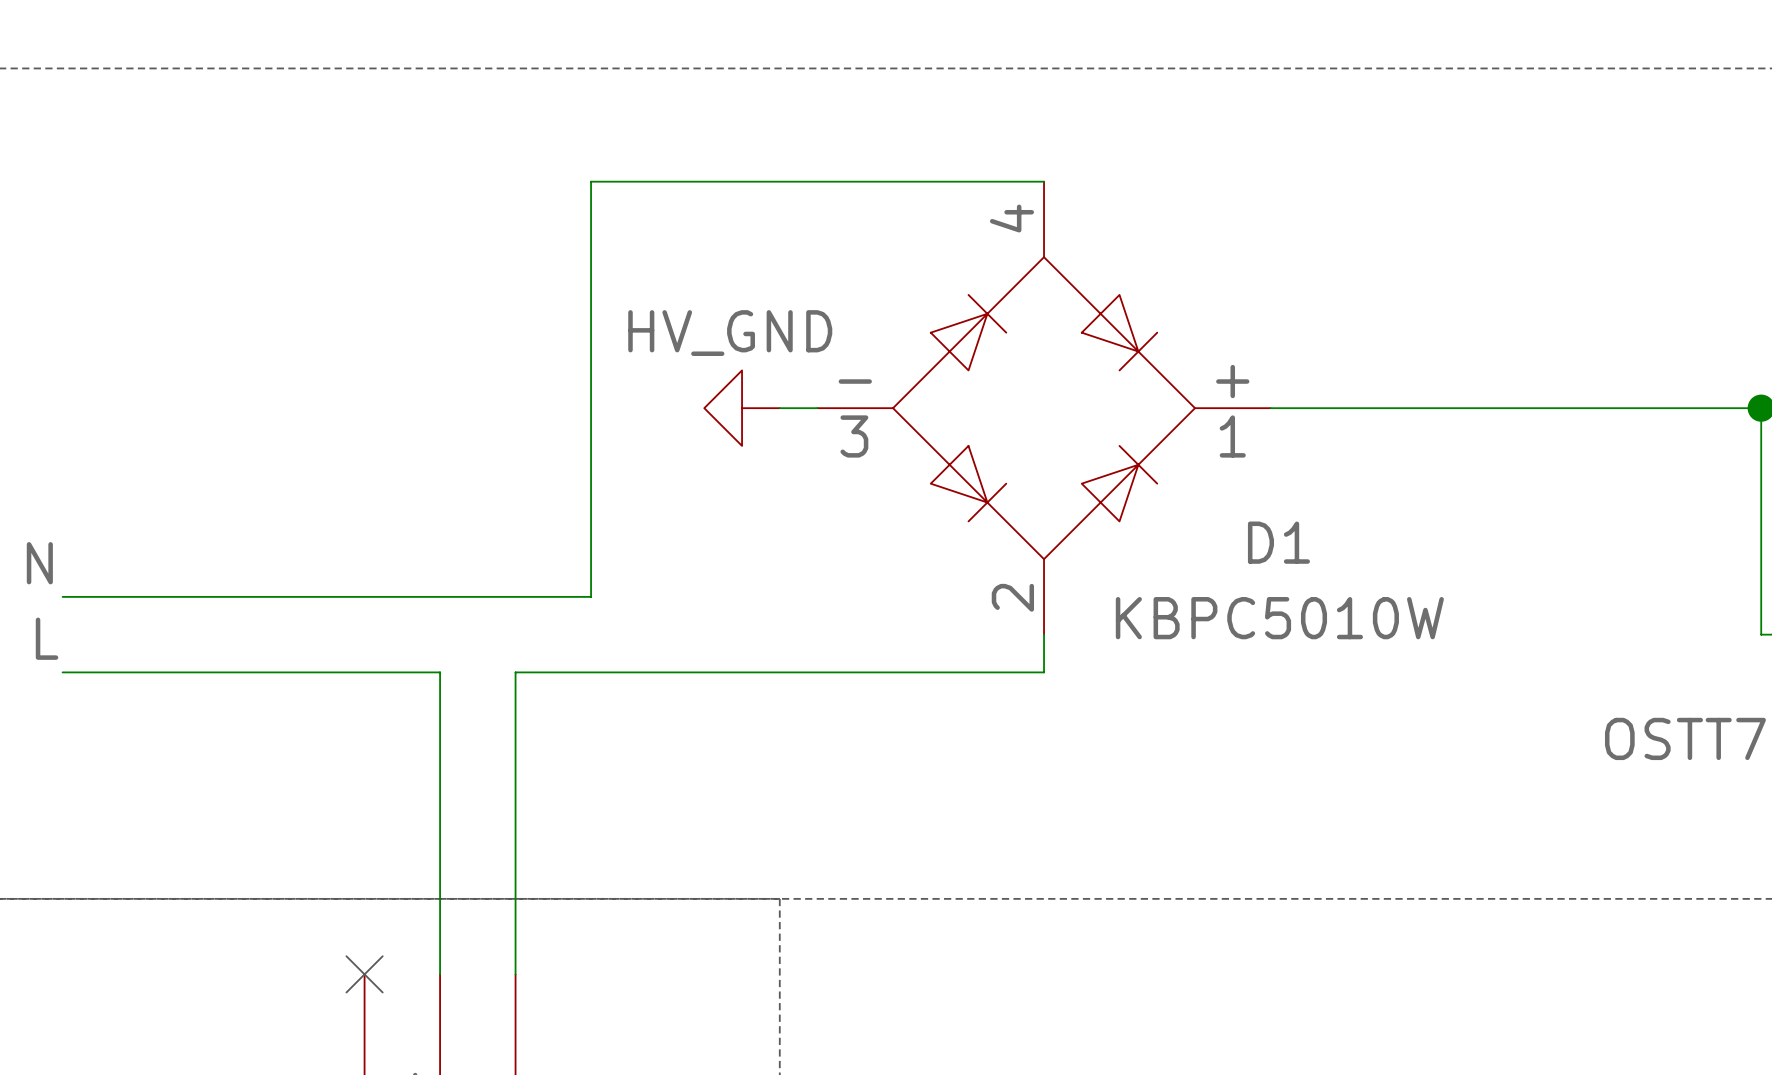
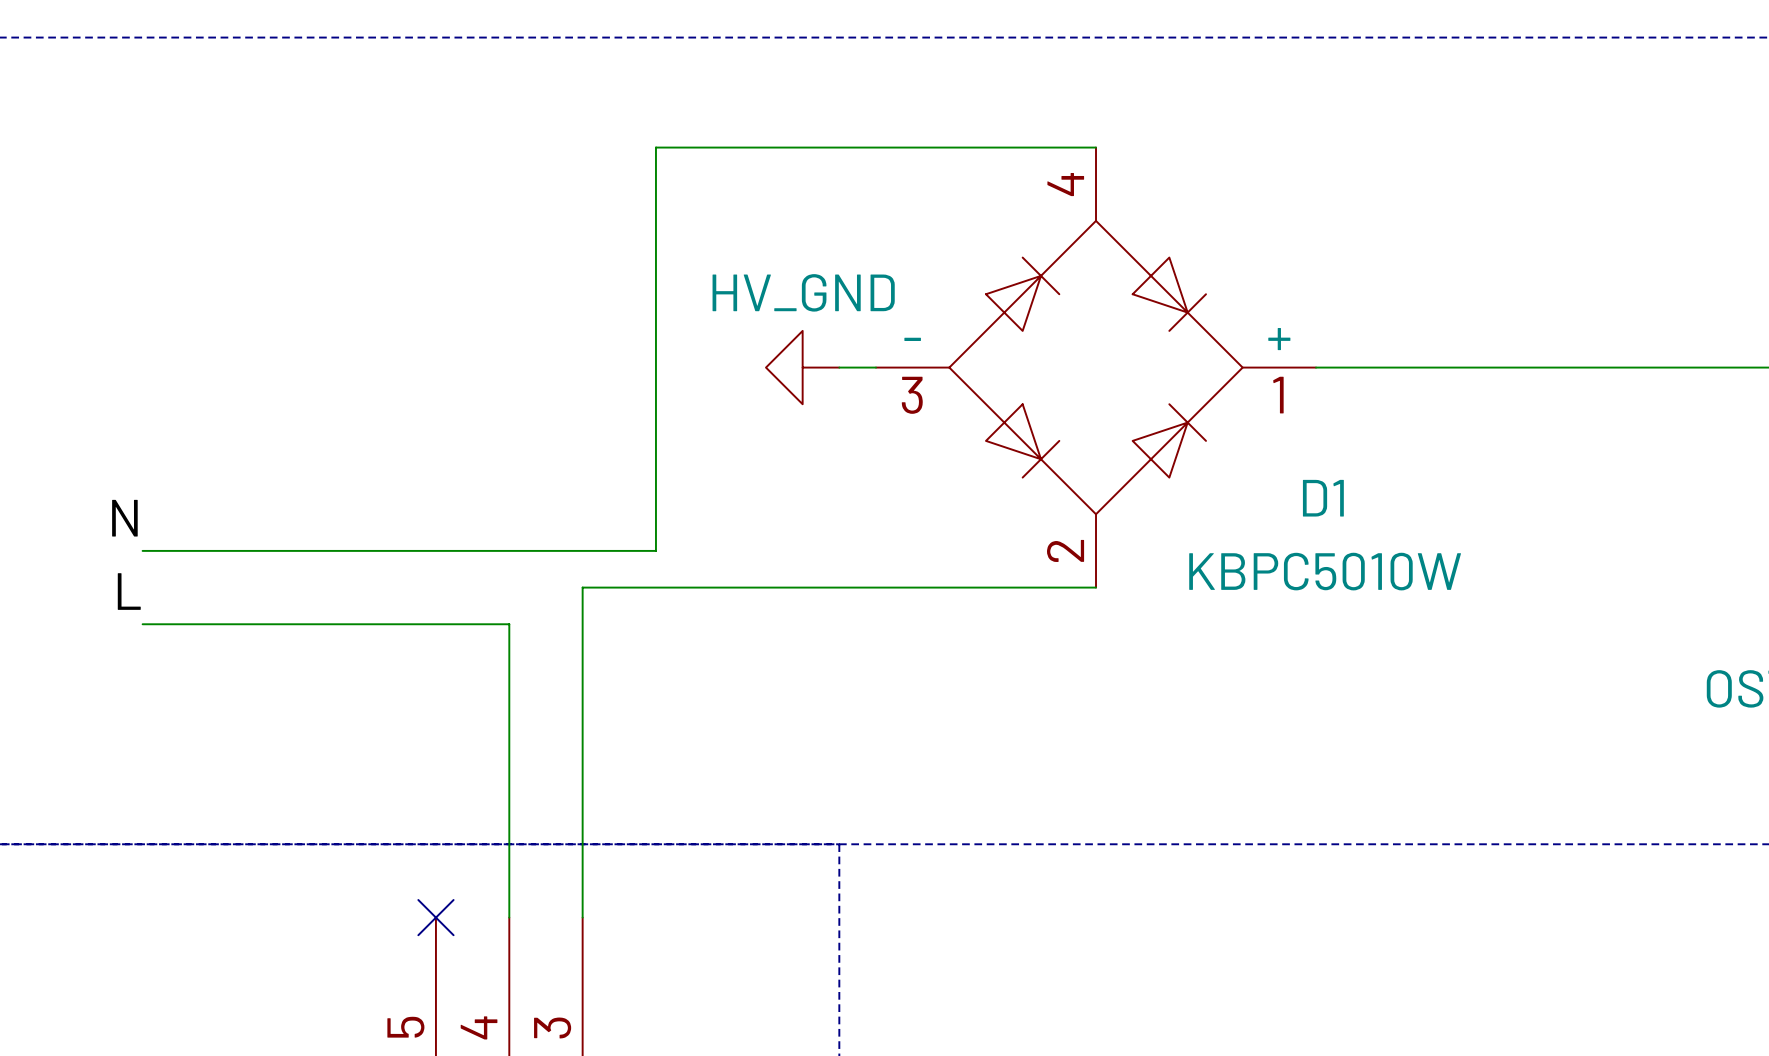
wire: (1044, 634) (1044, 672) (515, 672) -> (1096, 587) (582, 587) (582, 624)

